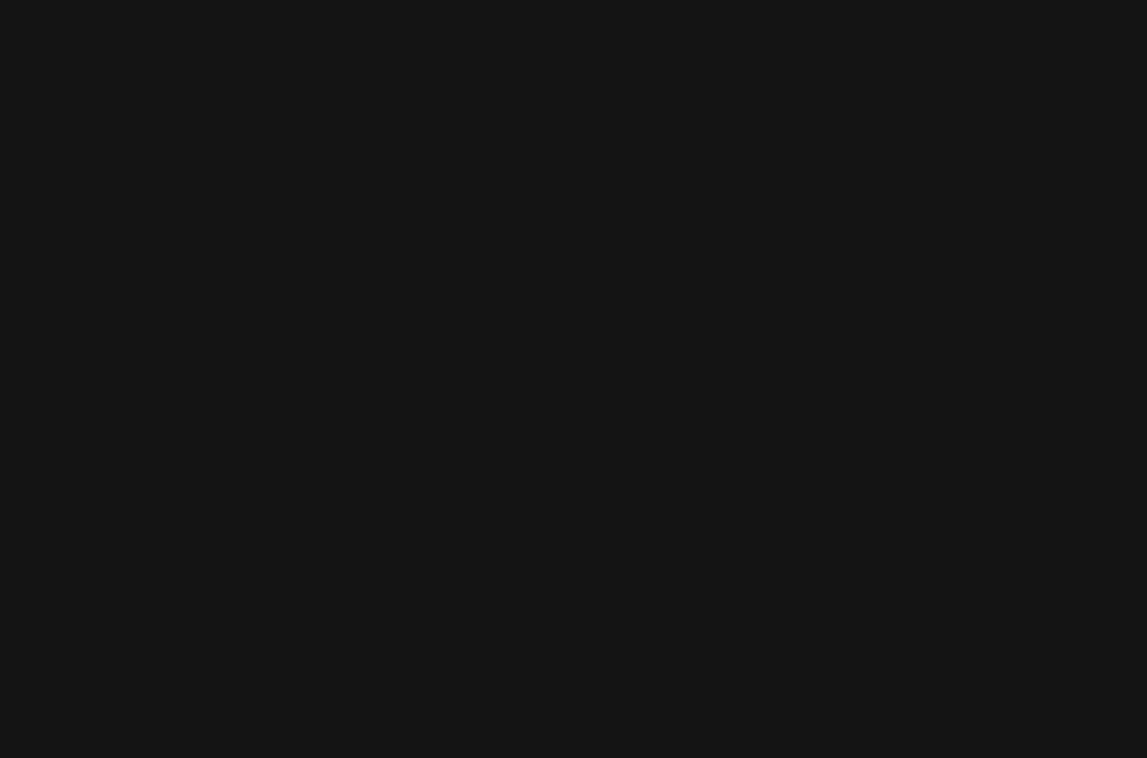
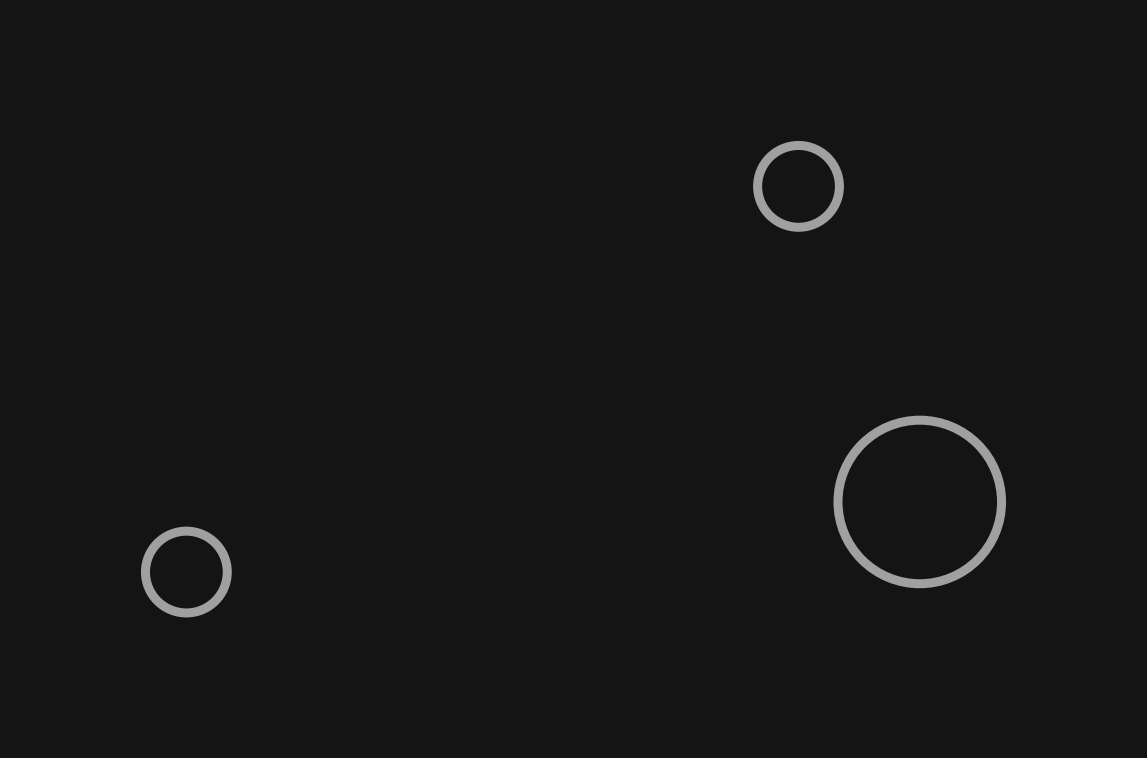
round board edge: none -> [753, 140, 844, 232]
round board edge: none -> [833, 415, 1007, 589]
round board edge: none -> [140, 526, 232, 618]

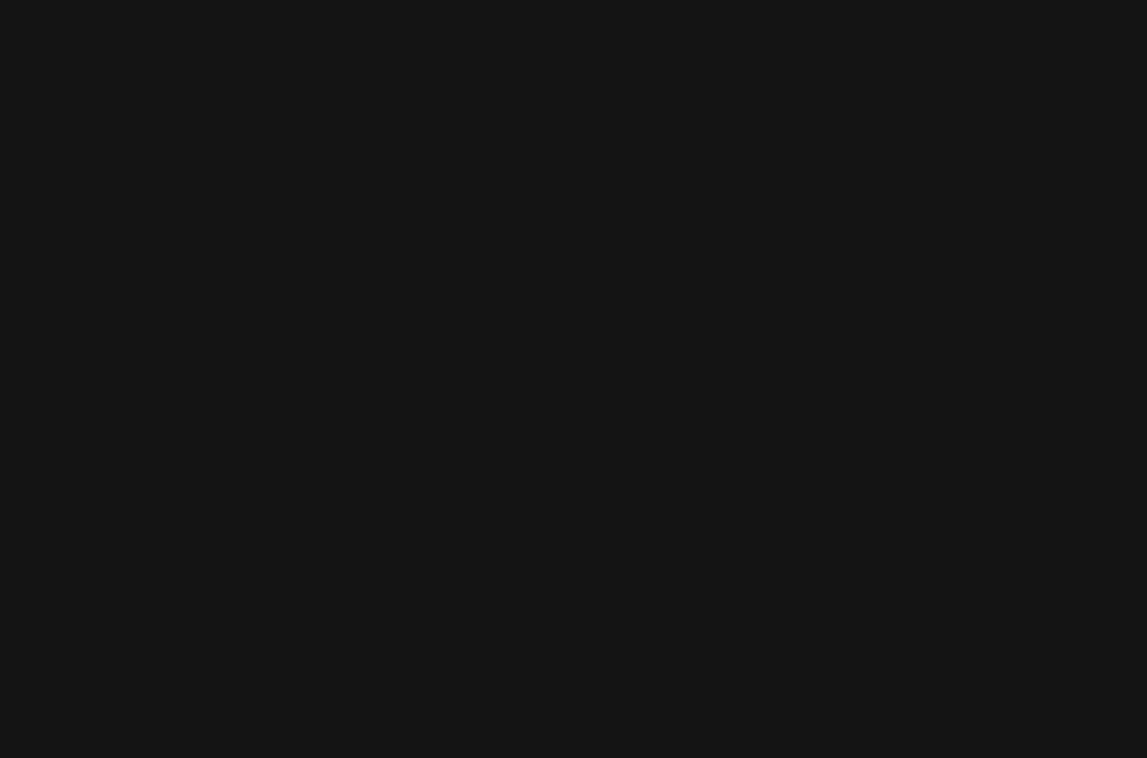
round board edge: [753, 140, 844, 232] -> none
round board edge: [833, 415, 1007, 589] -> none
round board edge: [140, 526, 232, 618] -> none

